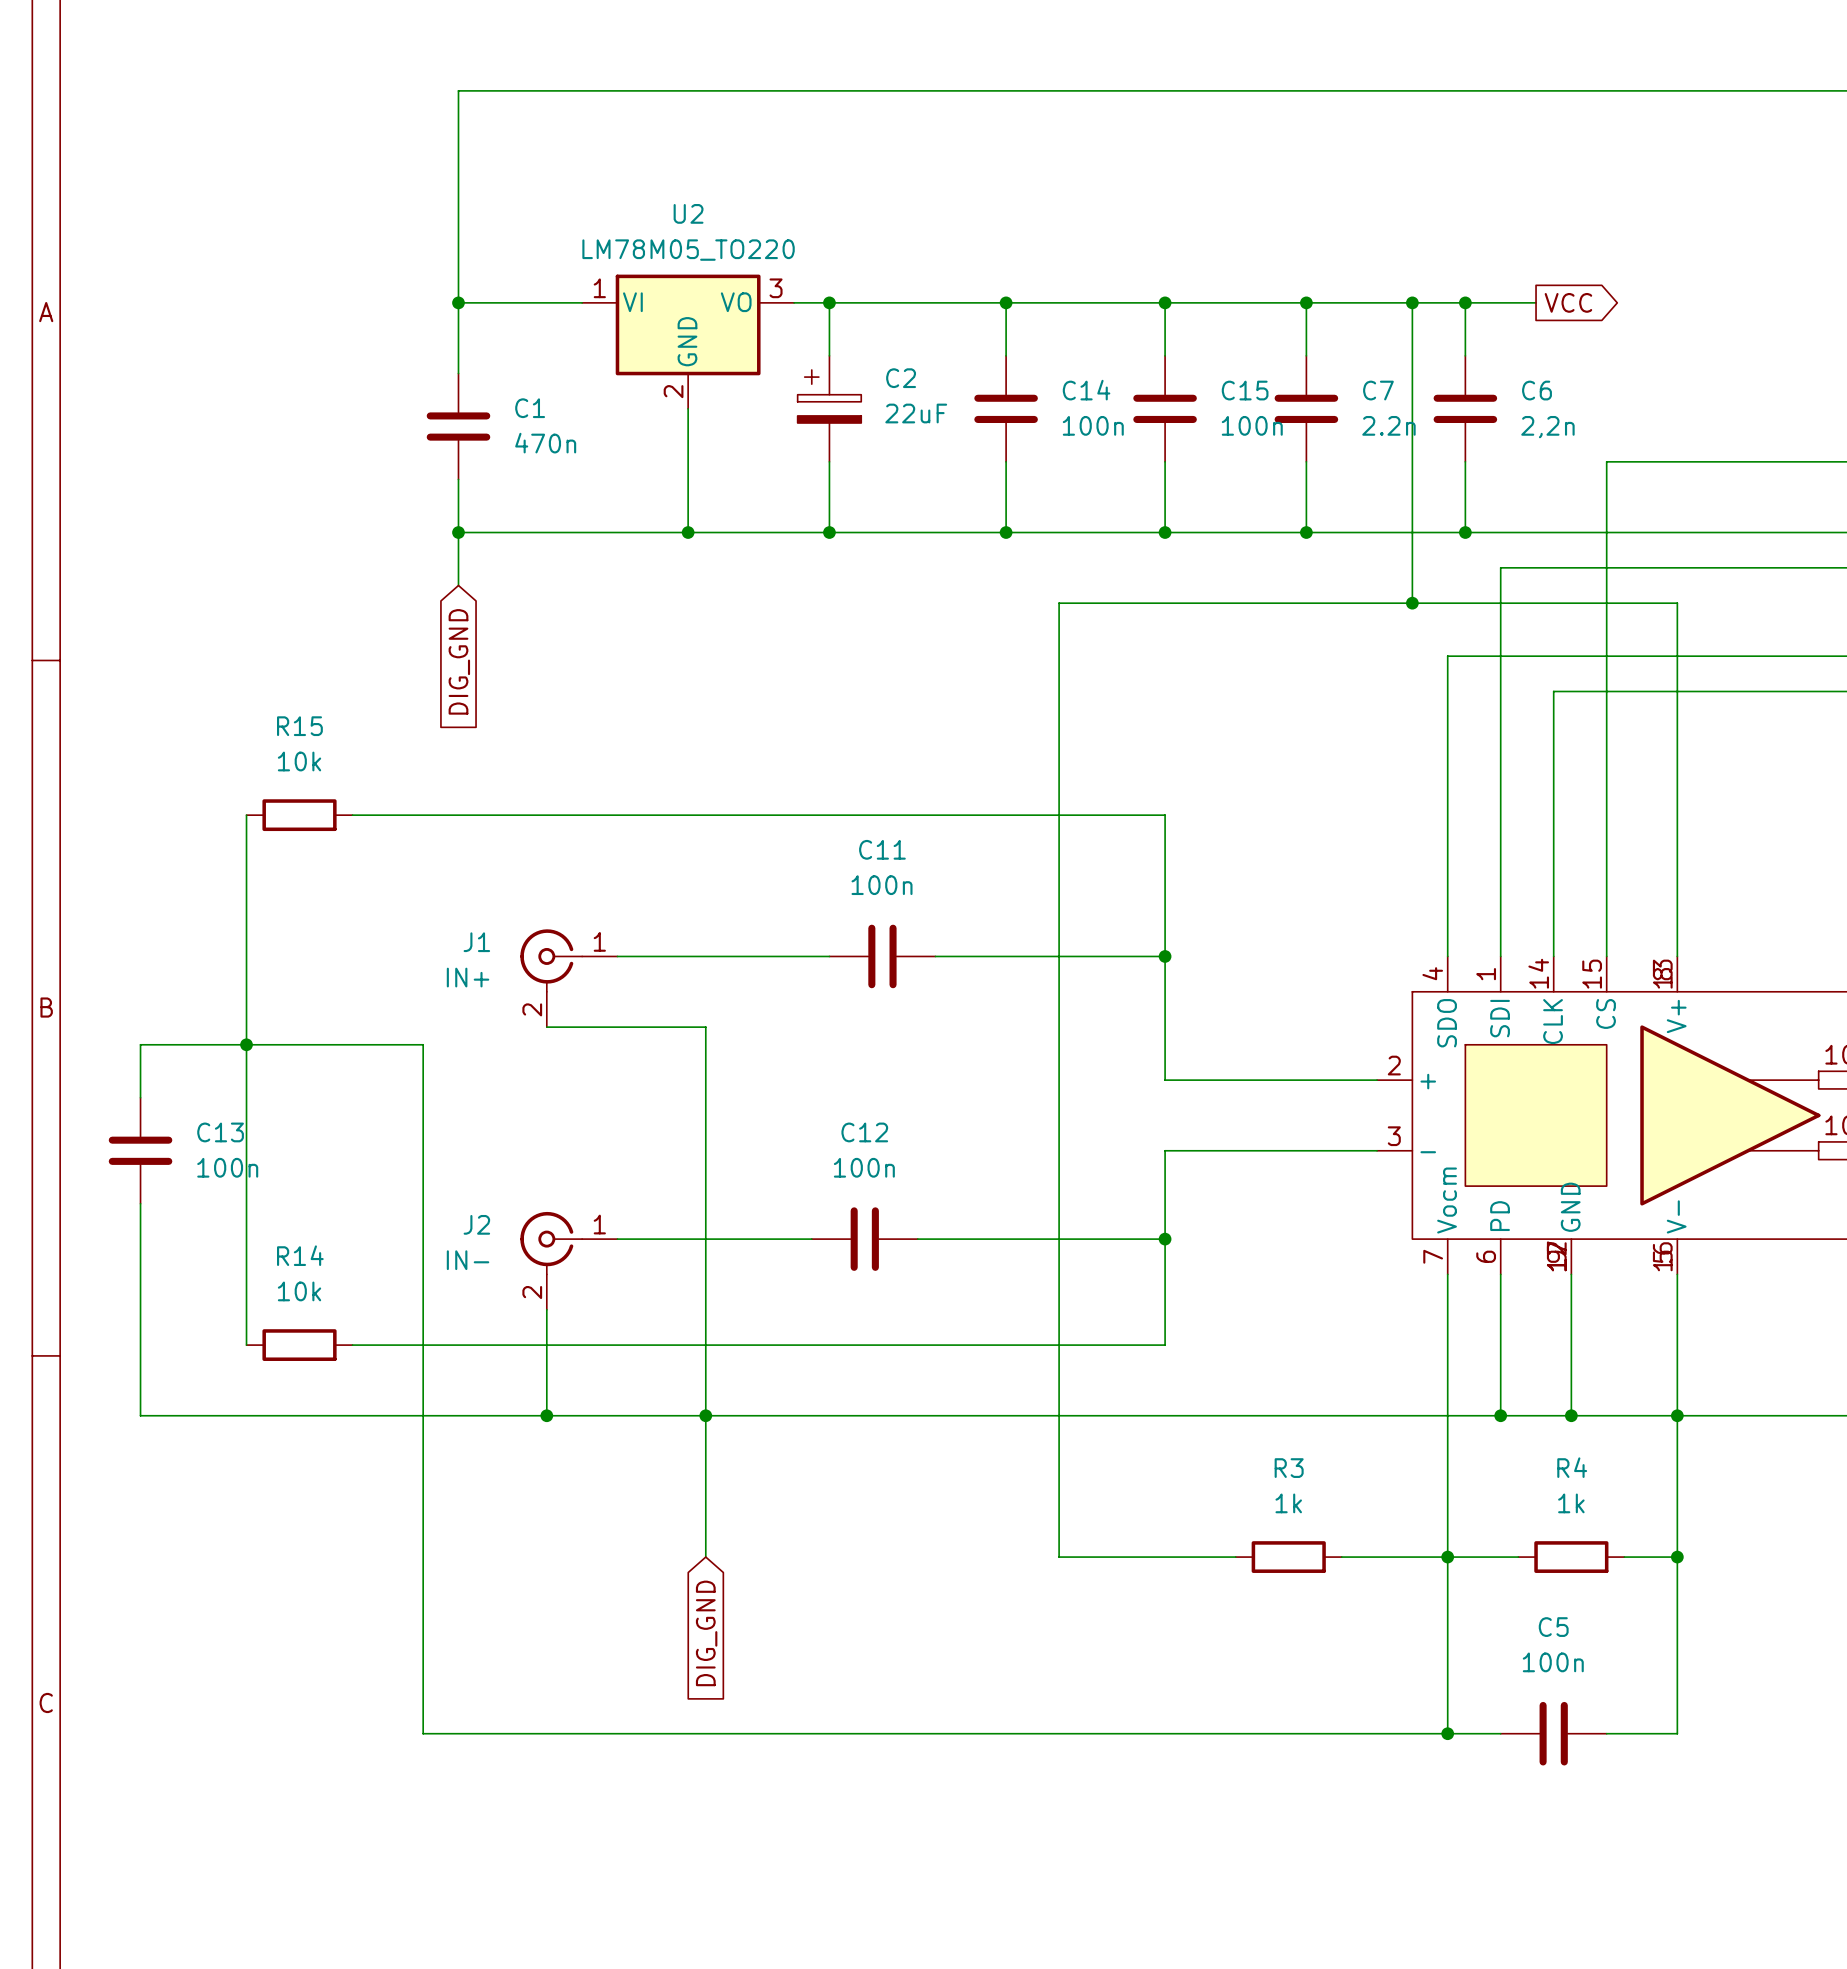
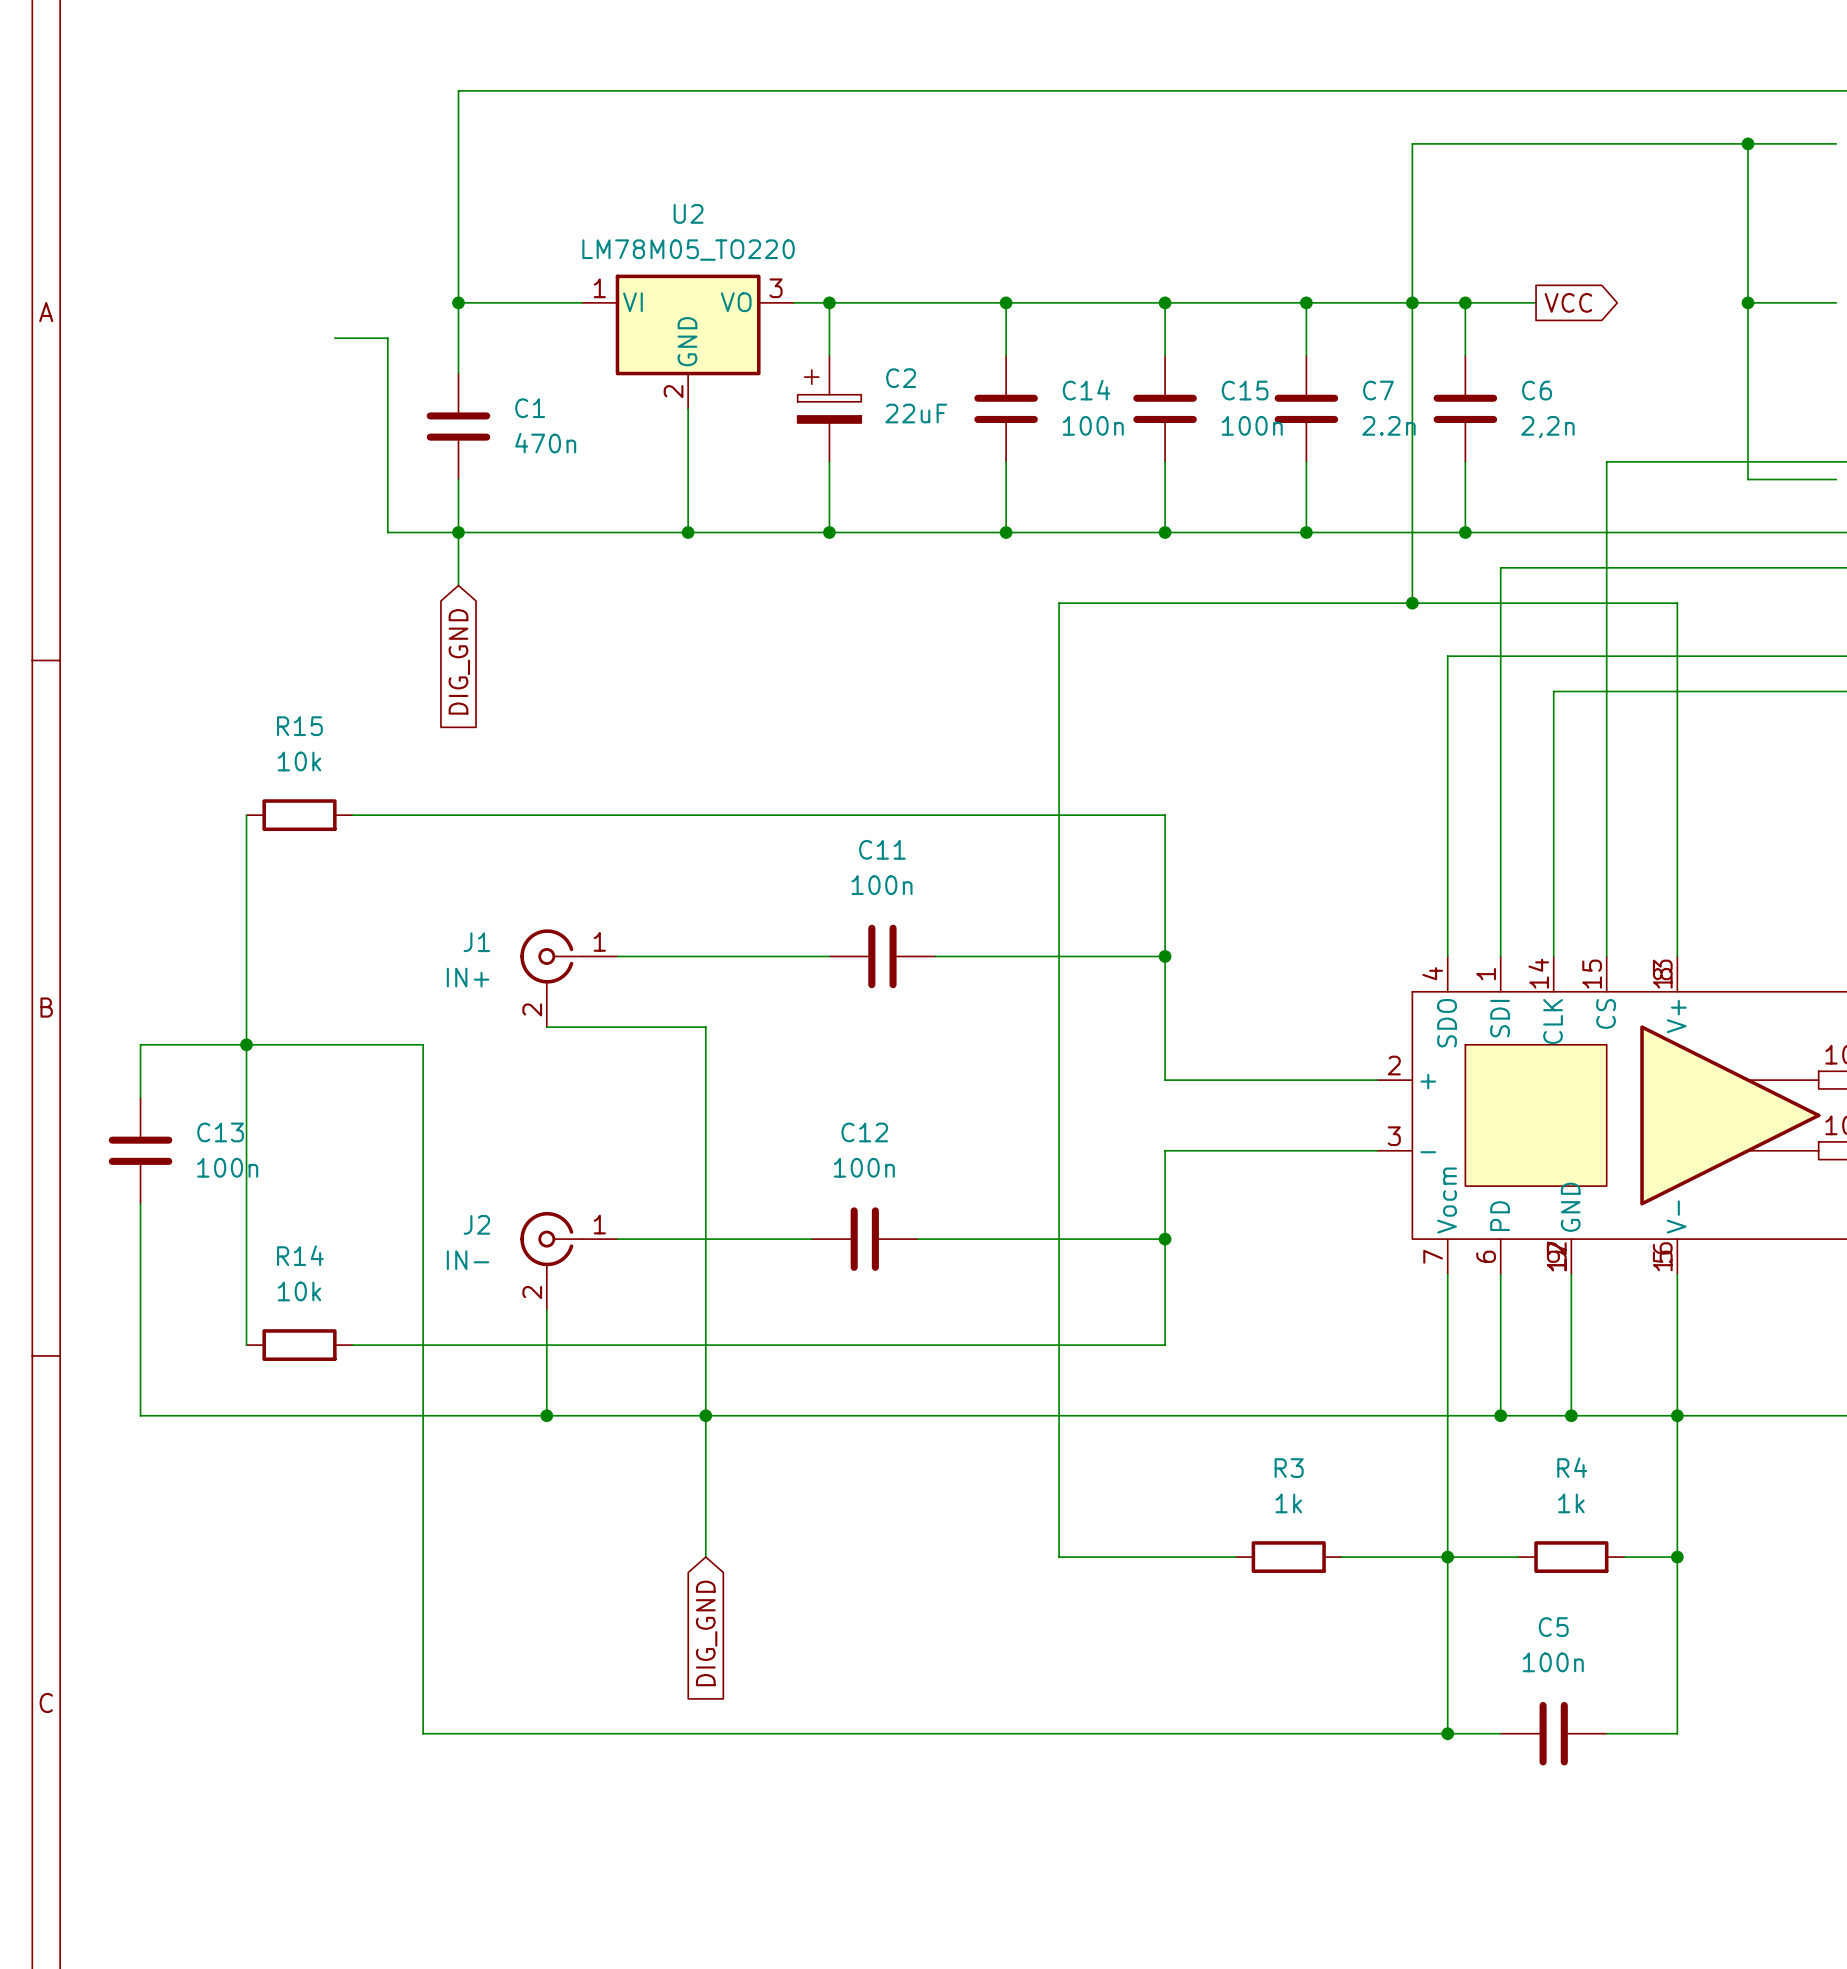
wire: none -> (1748, 143) (1748, 479) (1836, 479)
junction: none -> (1748, 143)
wire: none -> (1836, 143) (1412, 143) (1412, 302)
wire: none -> (1748, 302) (1836, 302)
junction: none -> (1748, 302)
wire: none -> (334, 338) (387, 338) (387, 532) (458, 532)

